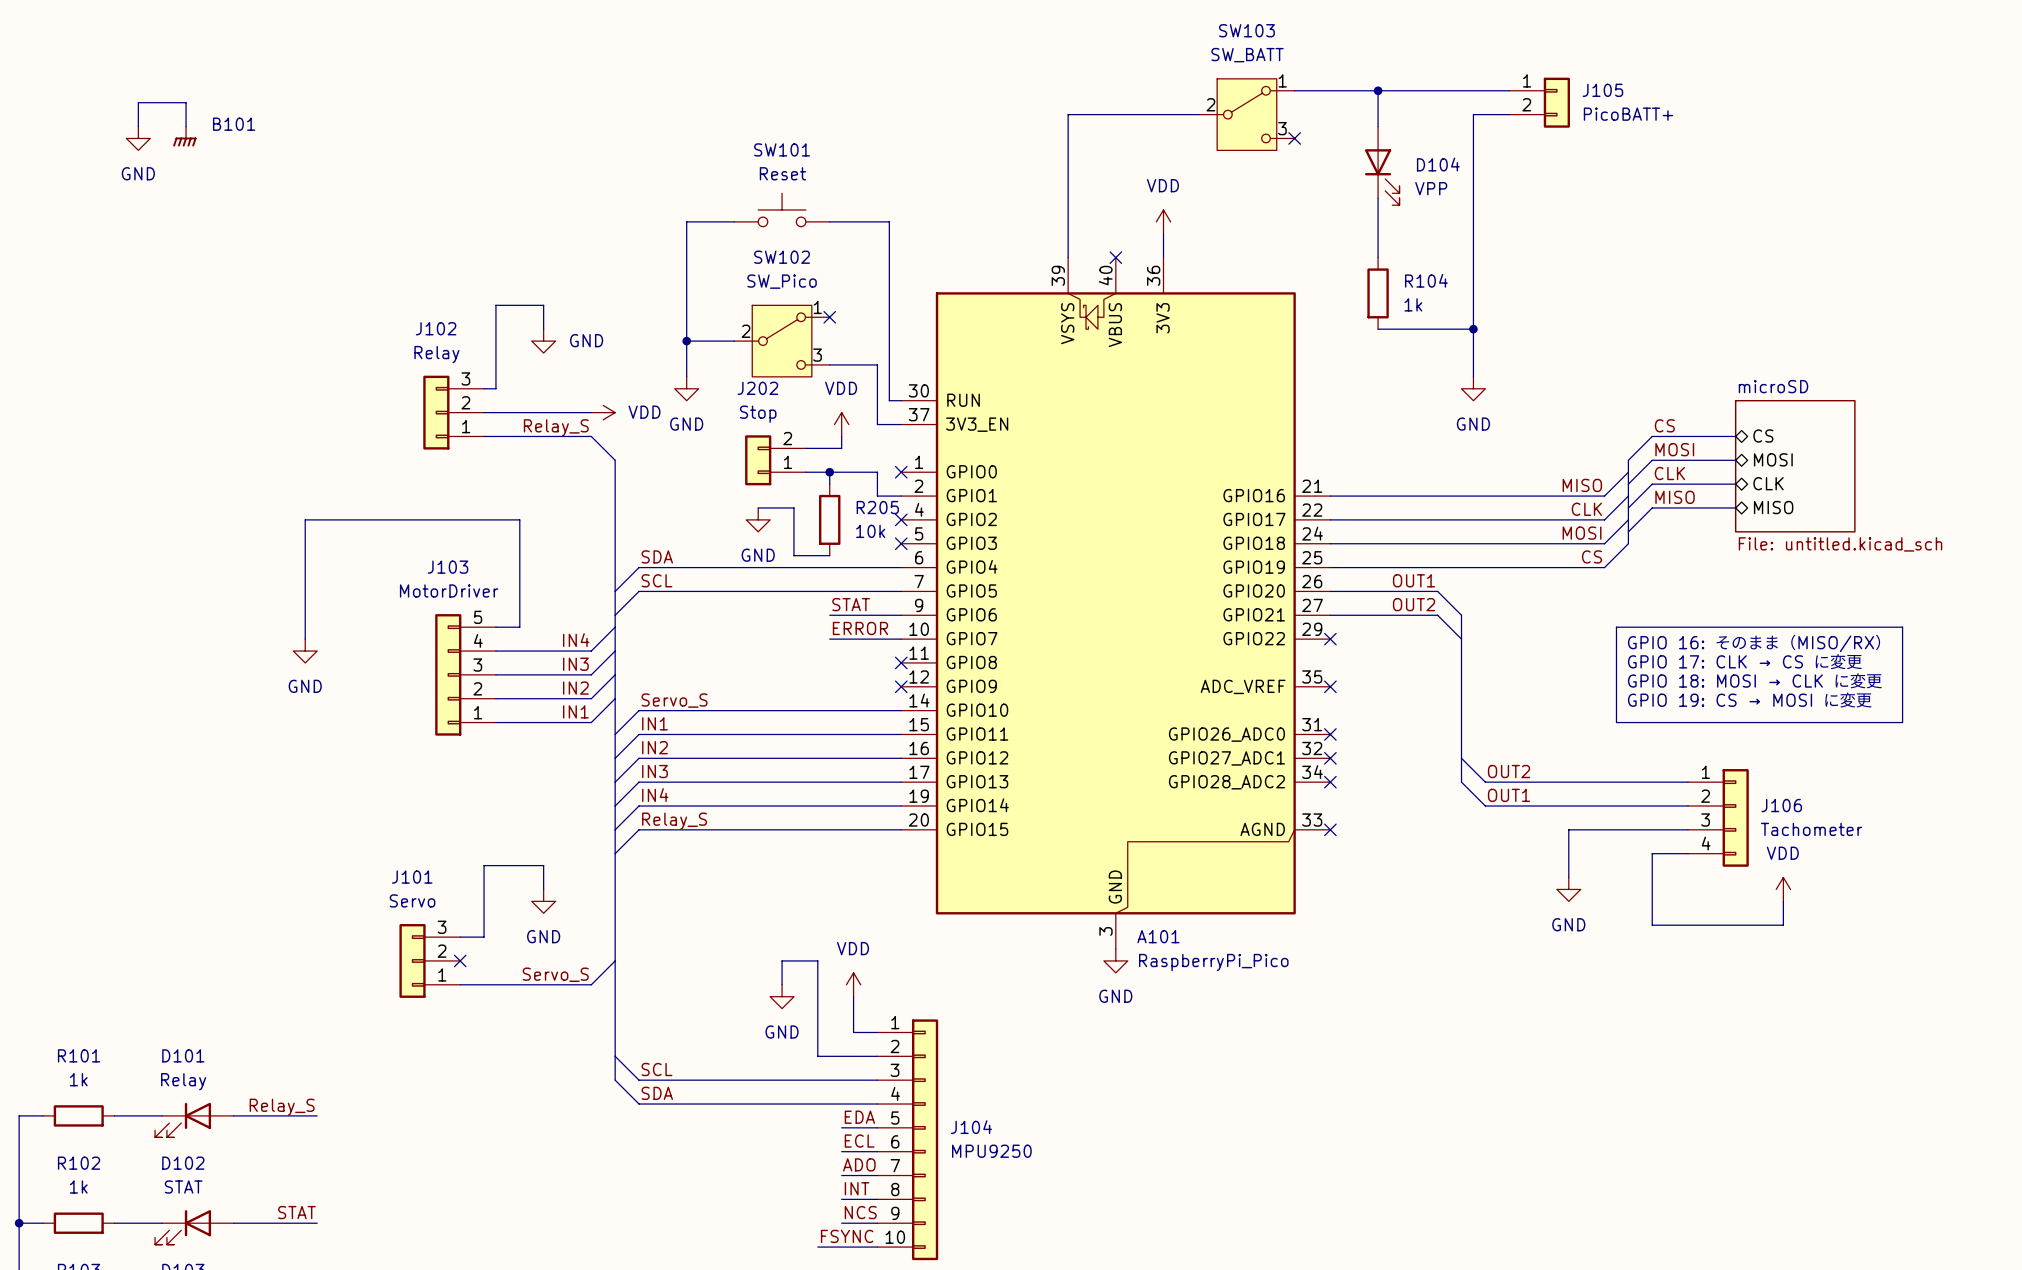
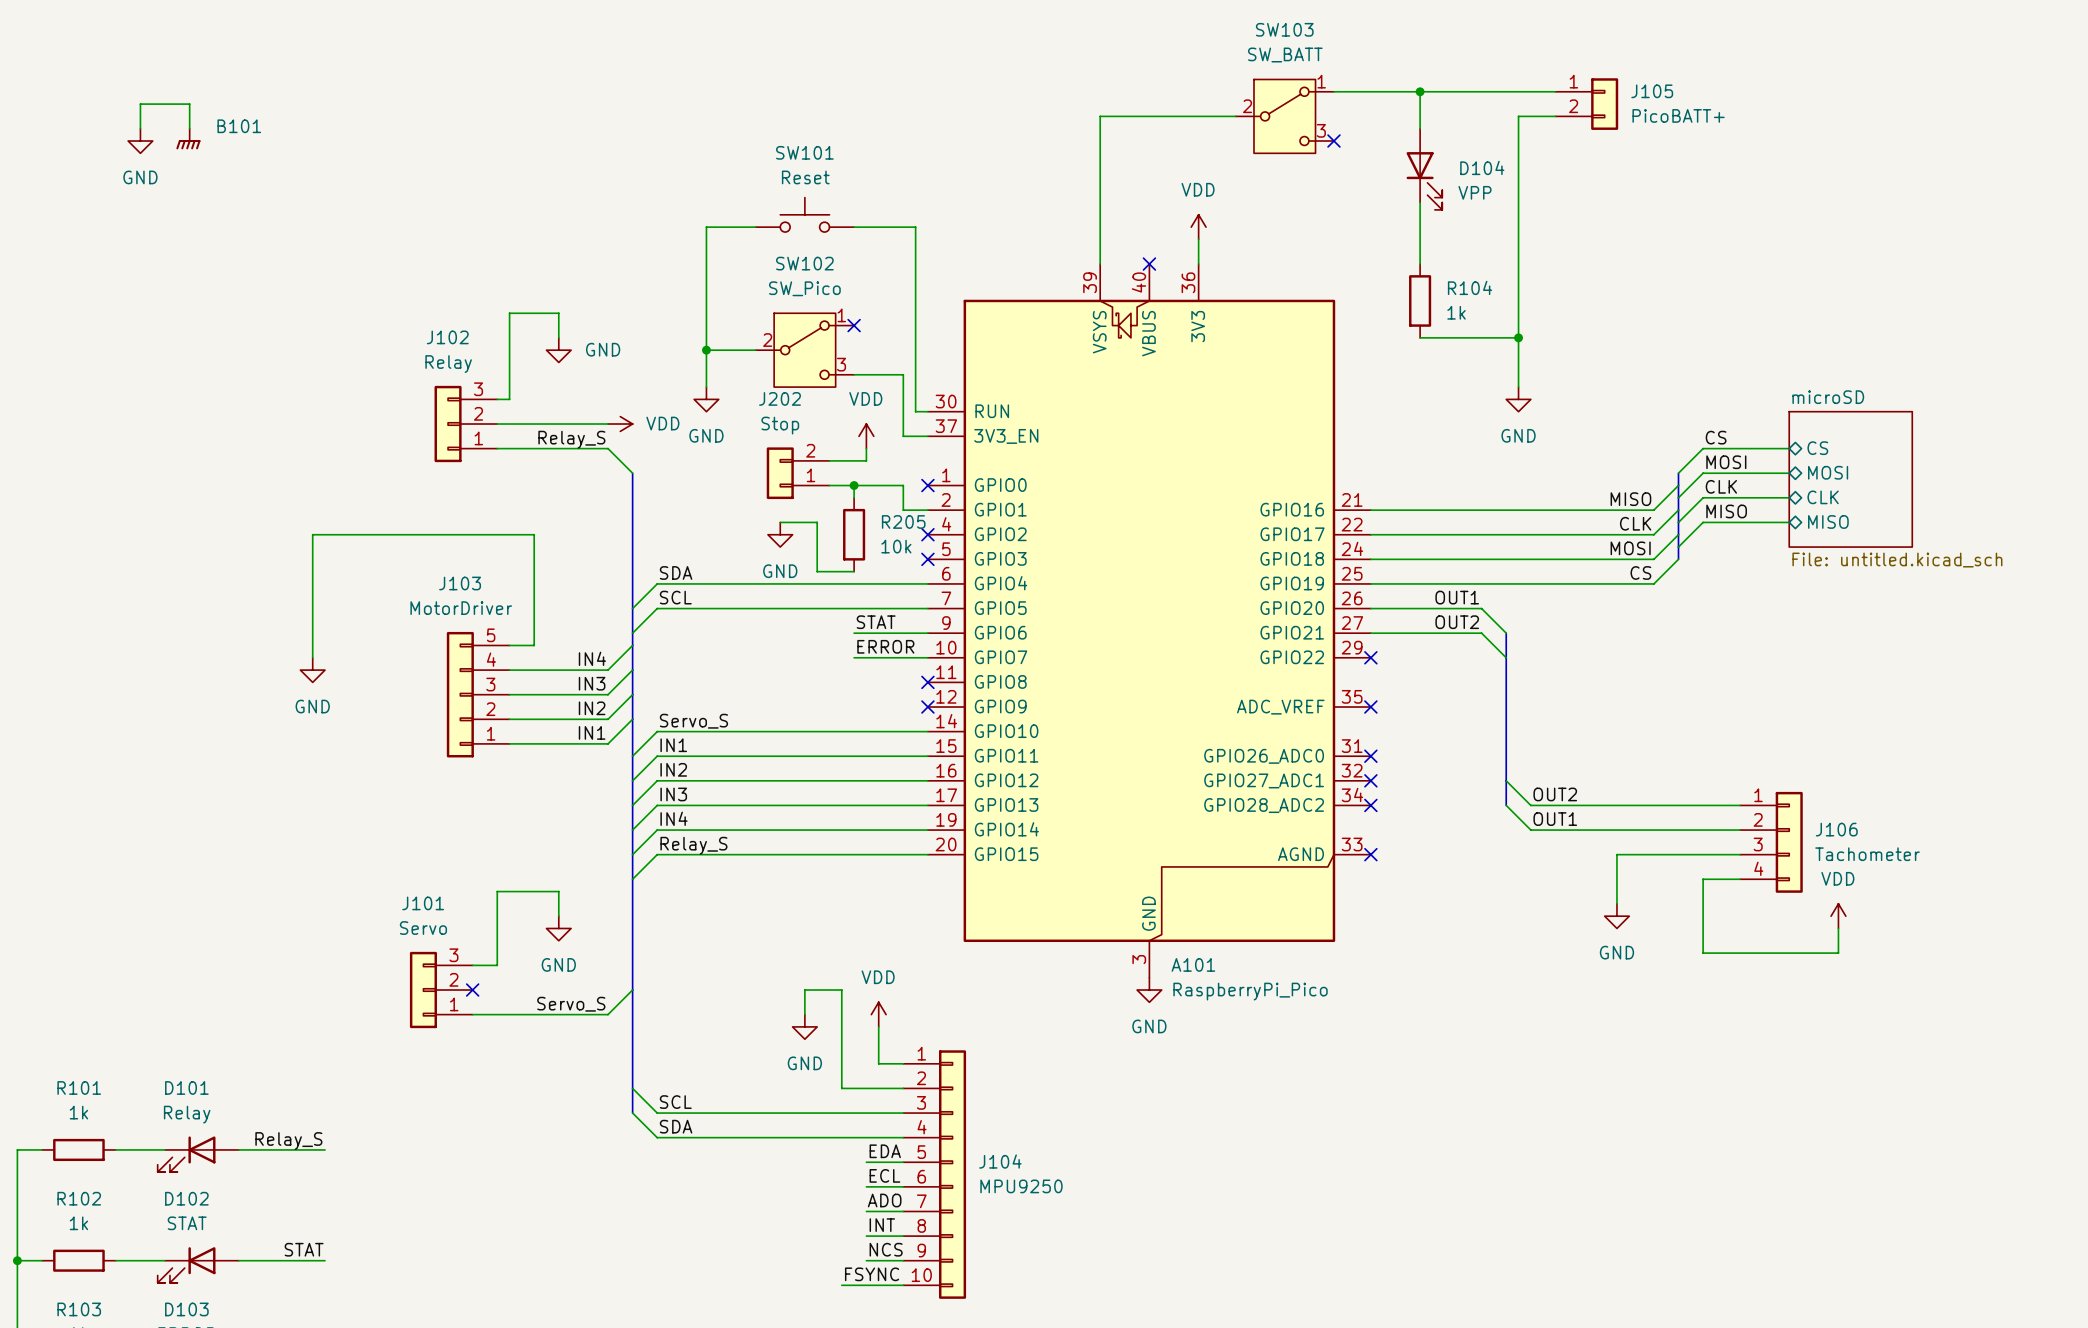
line: (1616, 627) (1902, 627) (1902, 722) (1616, 722) (1616, 627) -> none
text: GPIO 16: そのまま（MISO/RX） (1754, 643) -> none
text: GPIO 17: CLK → CS に変更 (1745, 661) -> none
text: GPIO 18: MOSI → CLK に変更 (1755, 680) -> none
text: GPIO 19: CS → MOSI に変更 (1750, 700) -> none

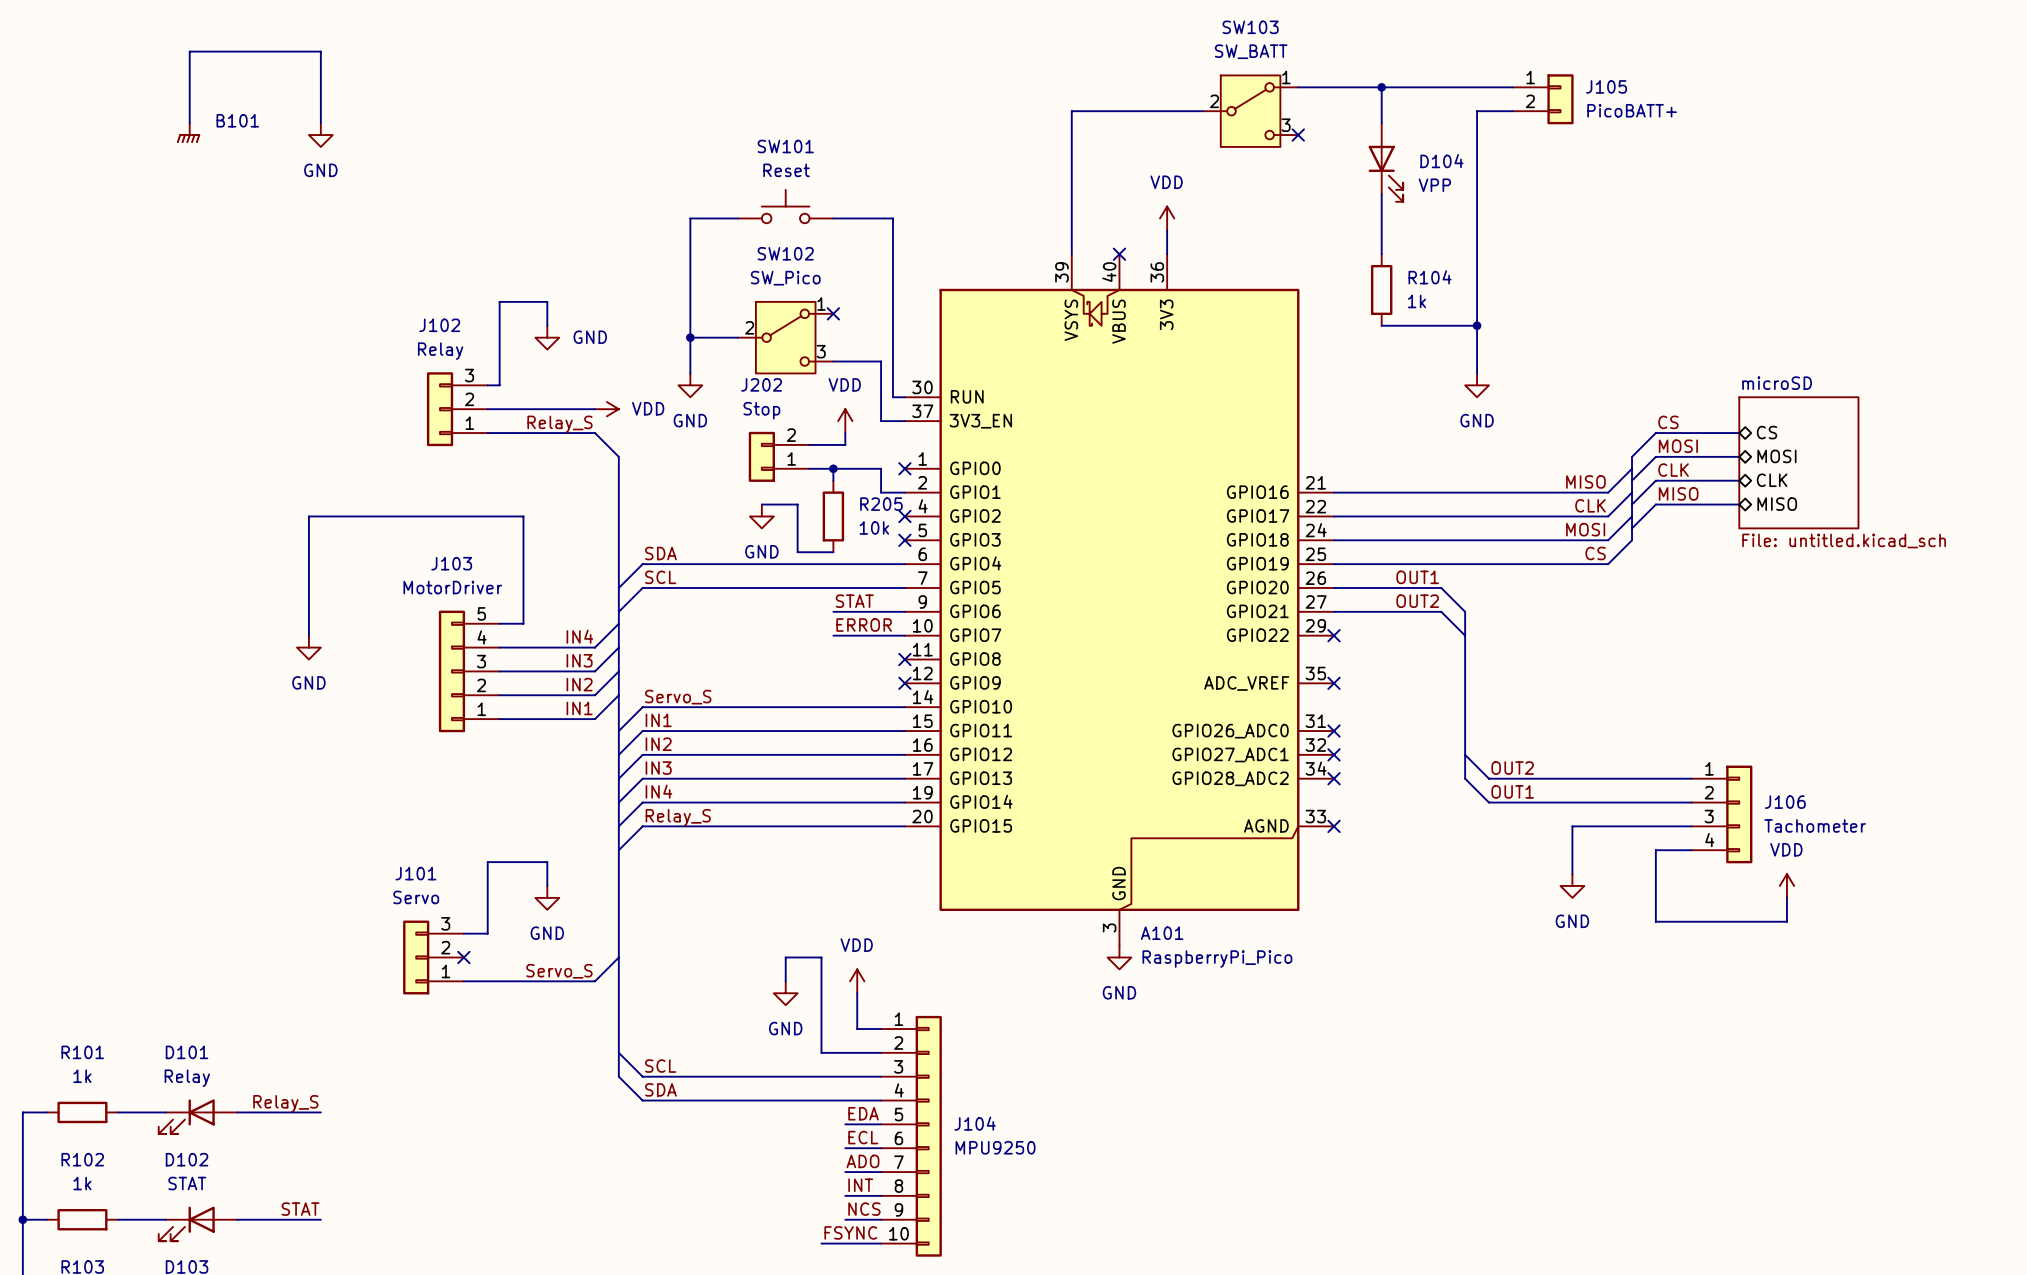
wire: (189, 104) (140, 104) (140, 128) -> (189, 99) (189, 51) (320, 51) (320, 123)
power symbol position: GND (140, 141) -> GND (320, 135)

